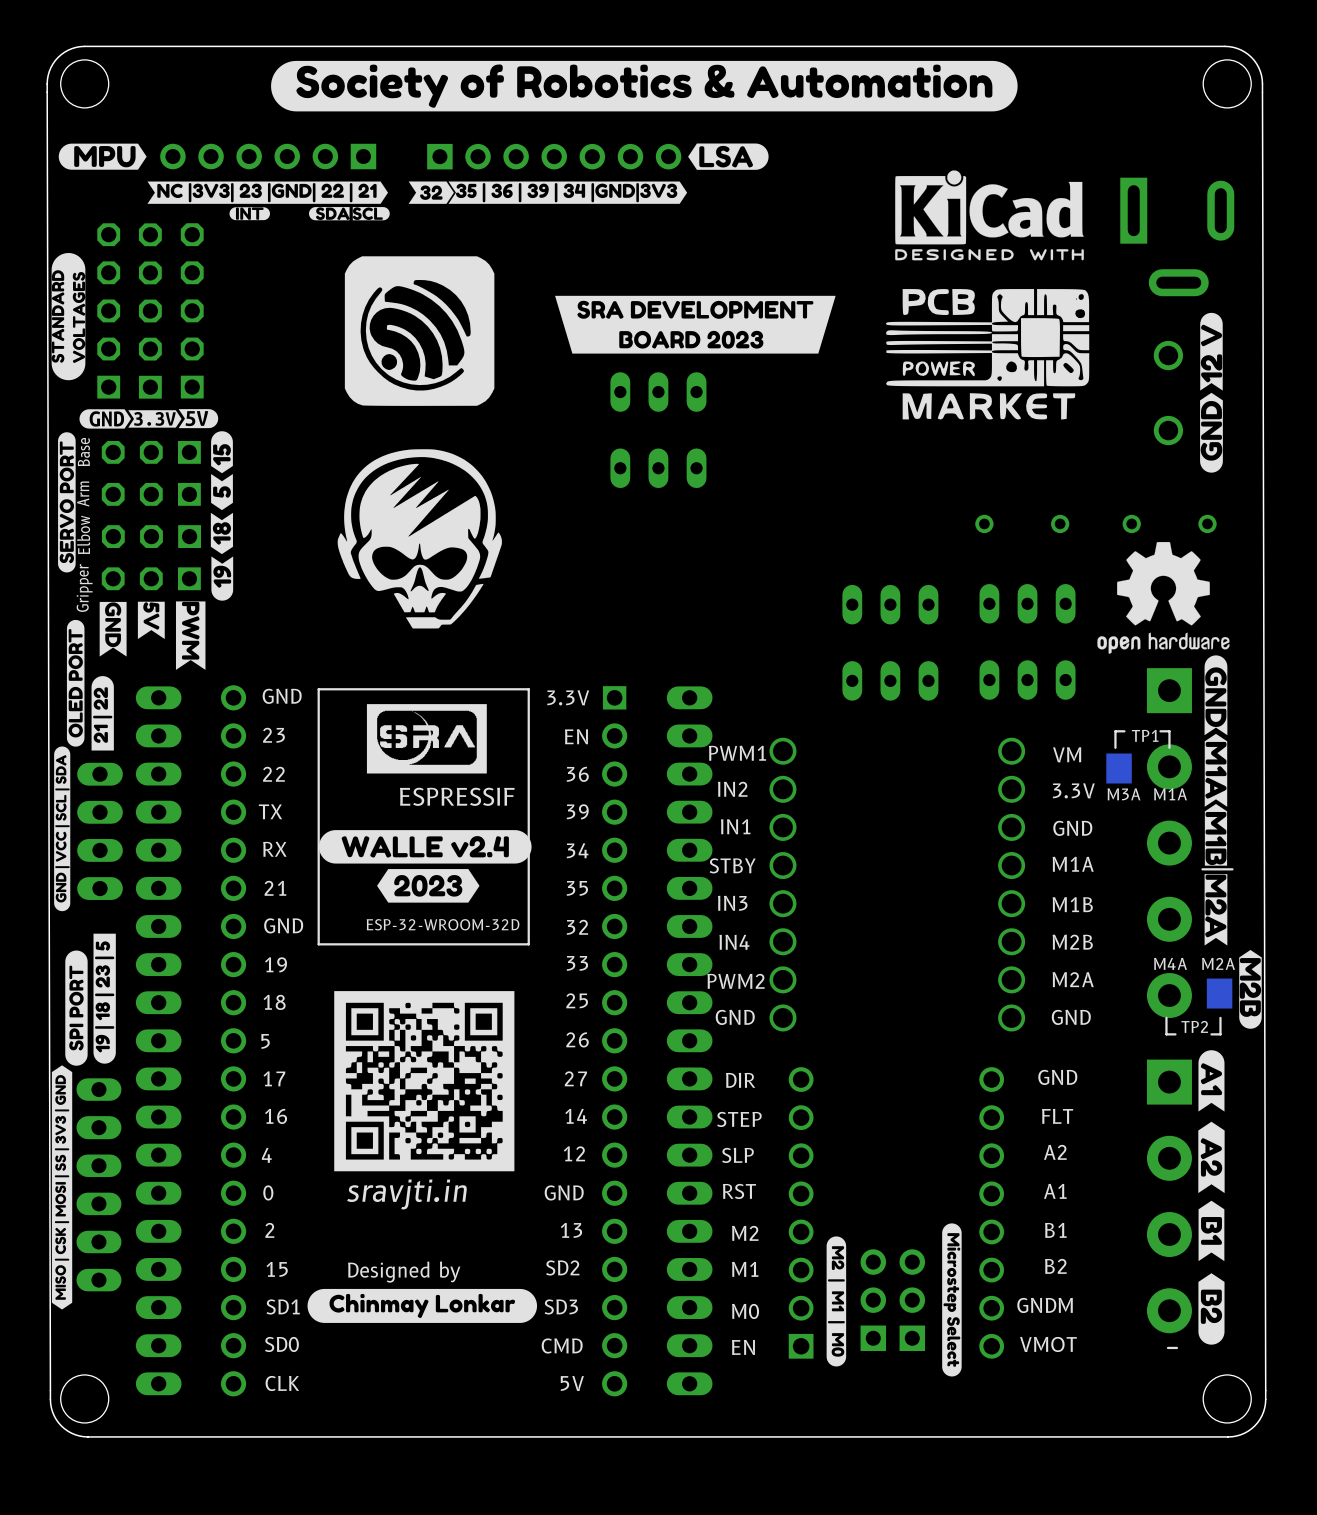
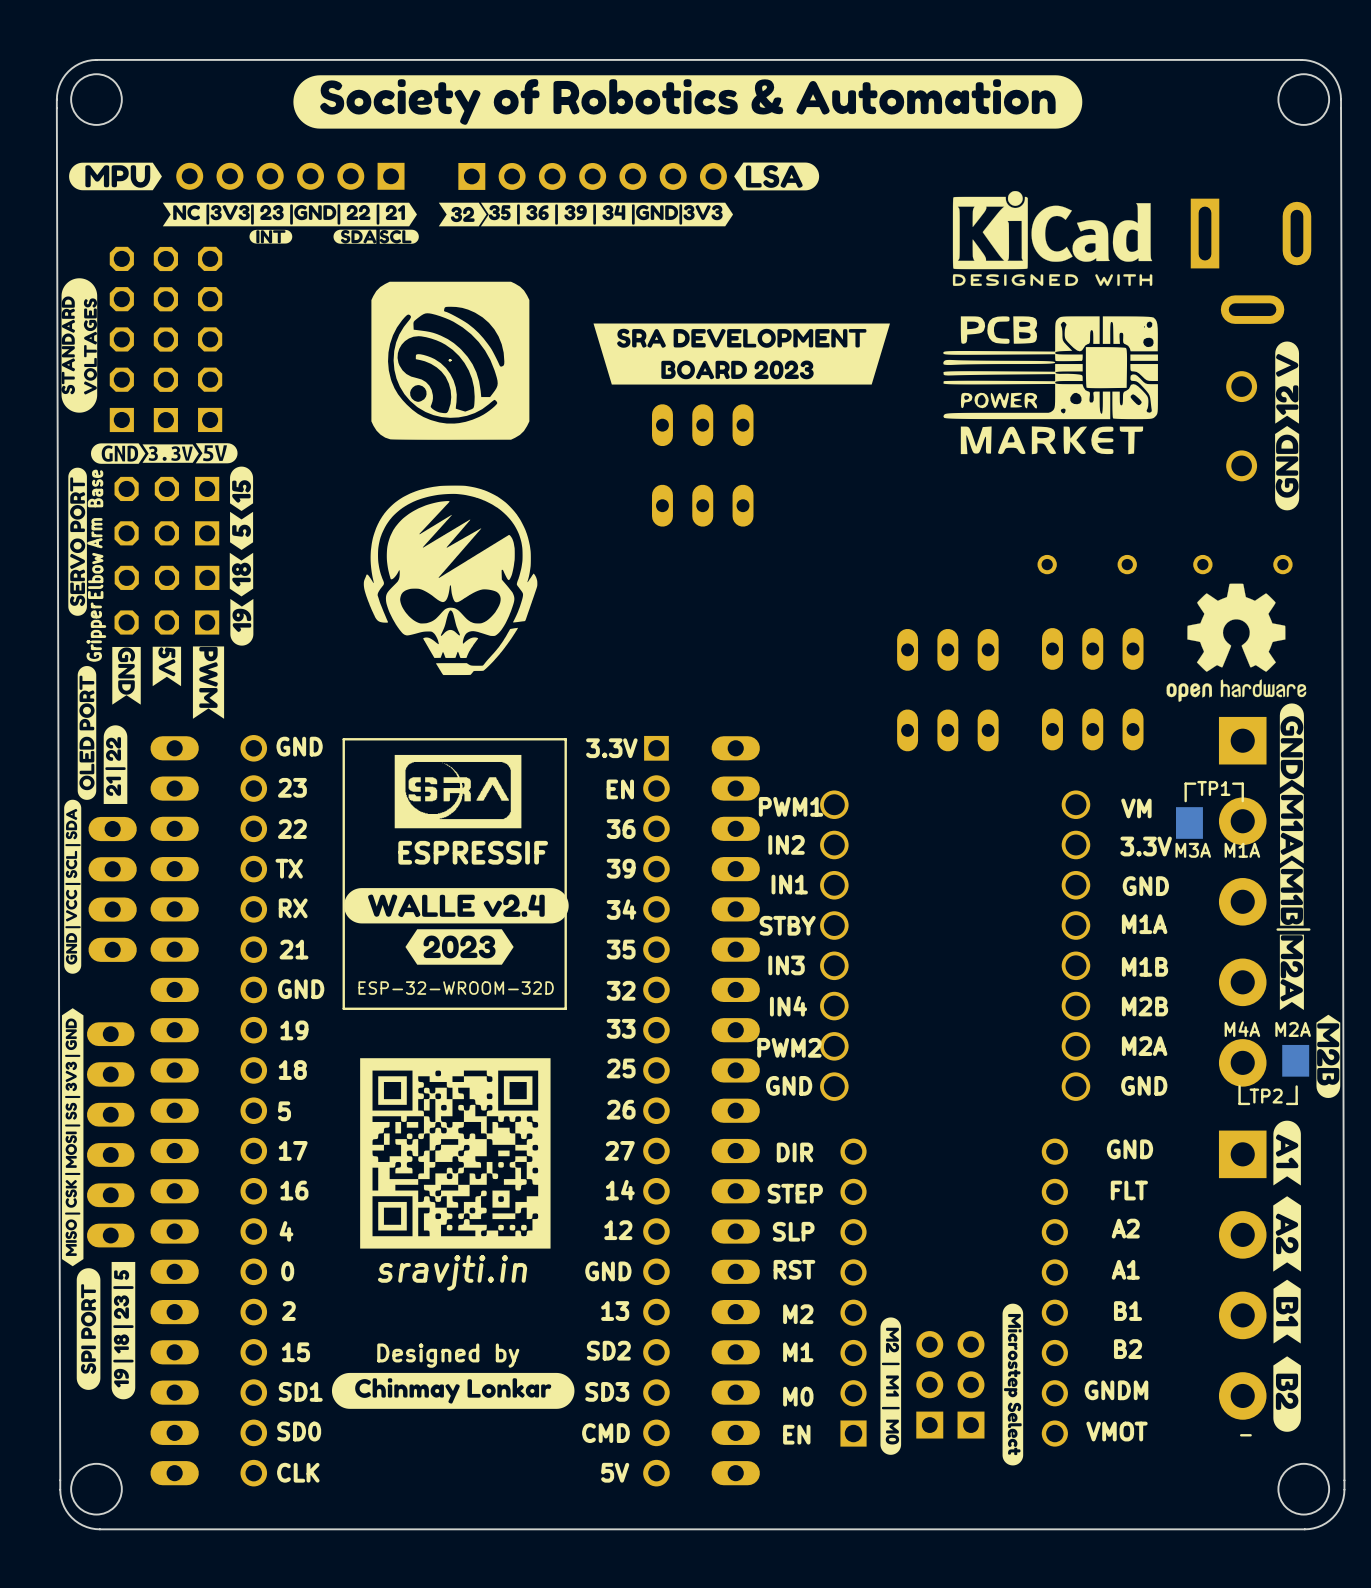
drawing position: (104, 998) -> (123, 1330)
drawing position: (76, 1008) -> (88, 1329)
part position: (98, 1184) -> (110, 1134)
drawing position: (62, 1187) -> (72, 1137)

